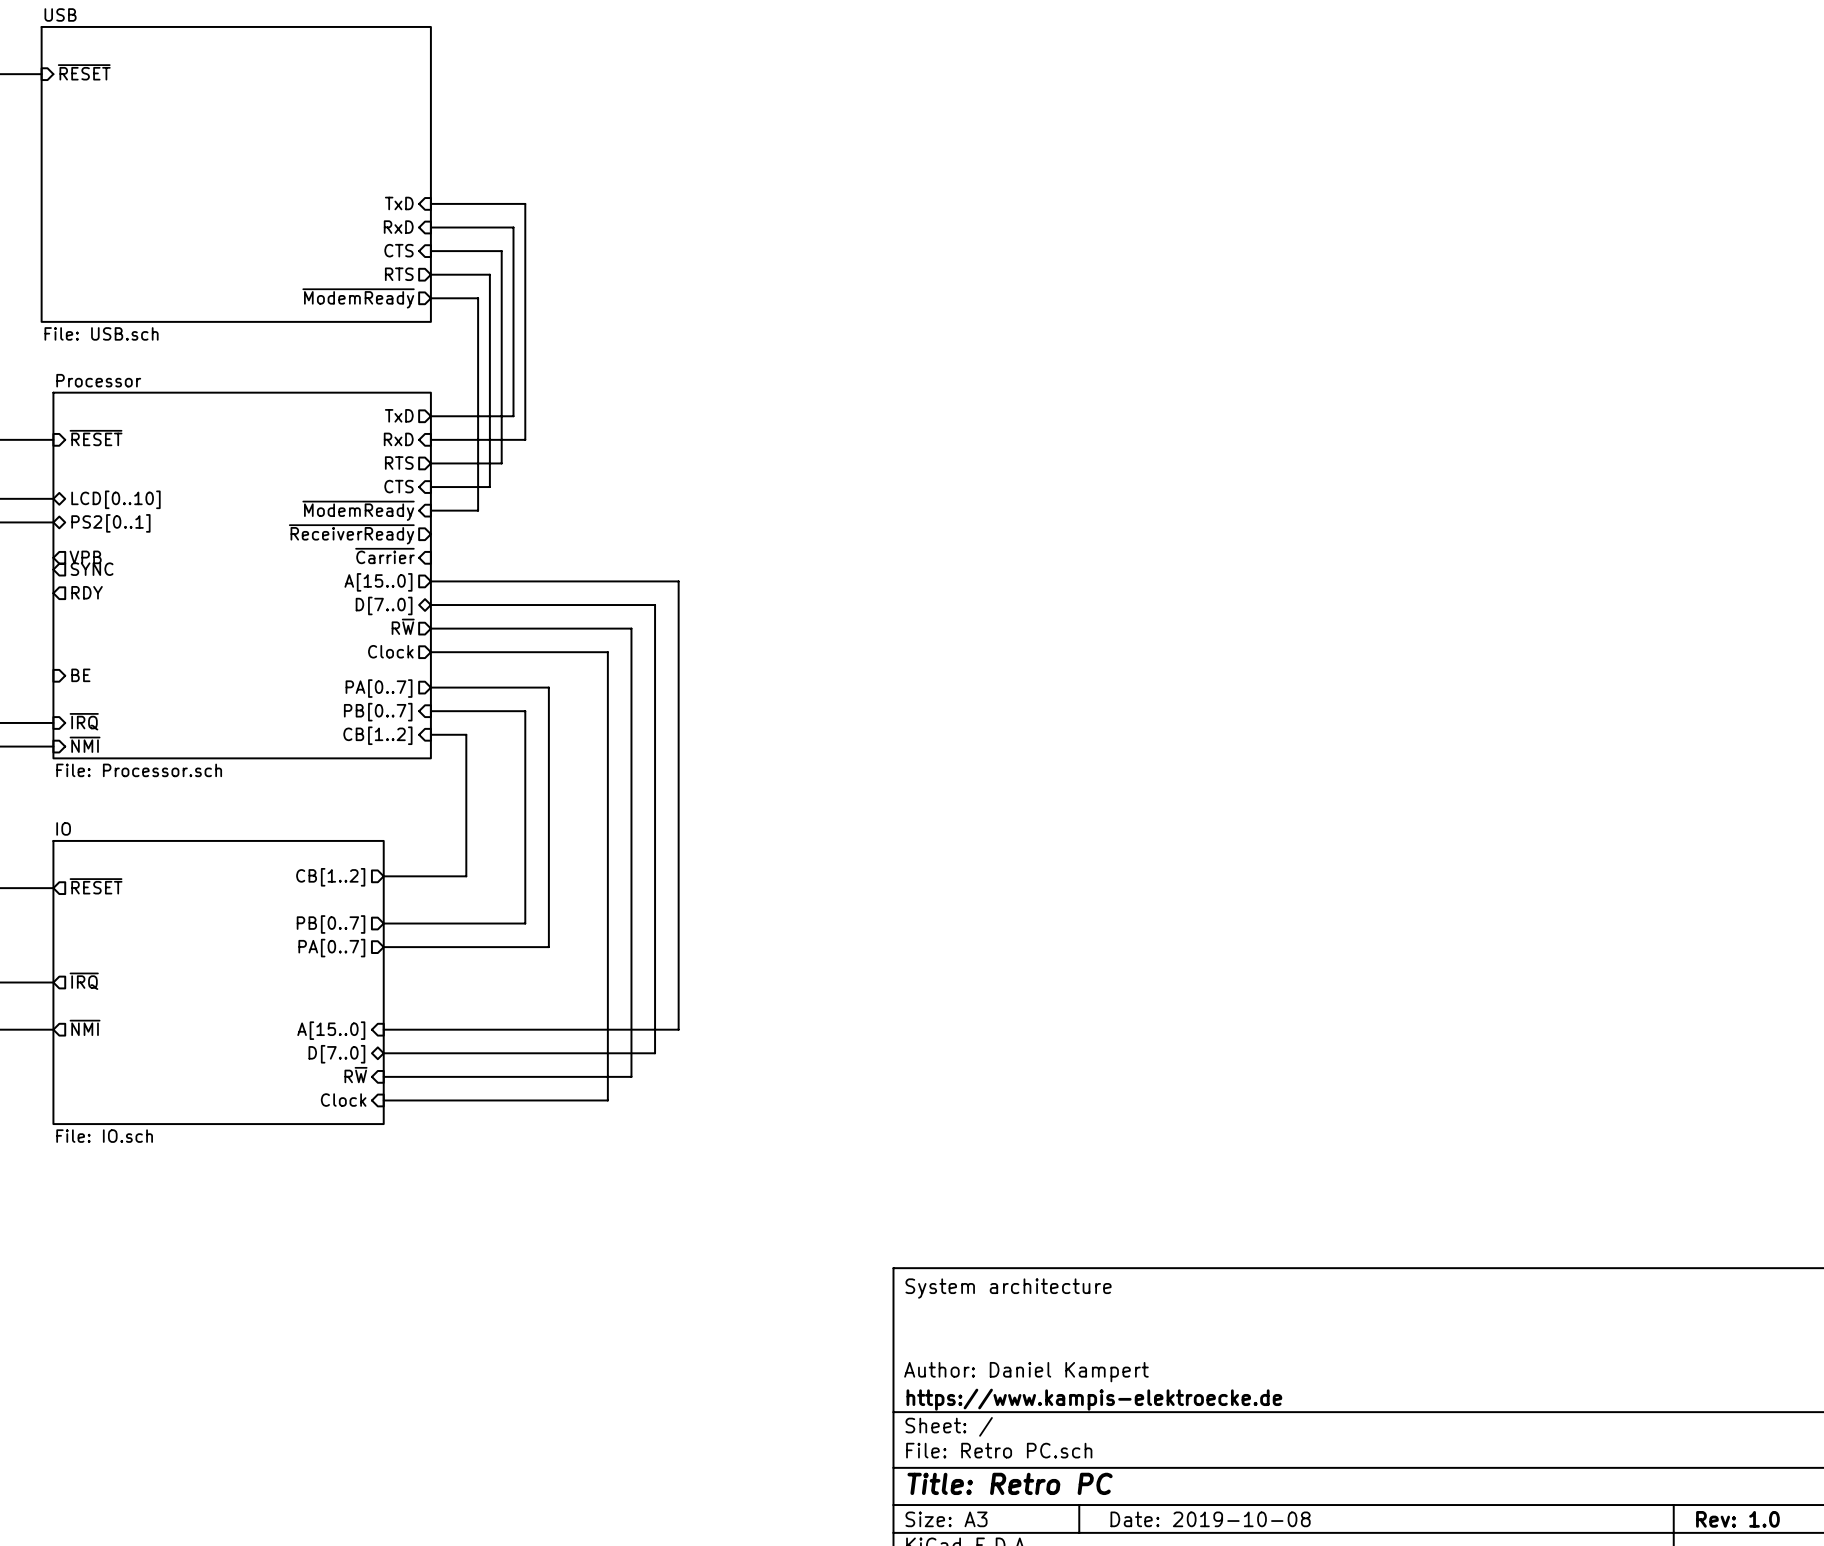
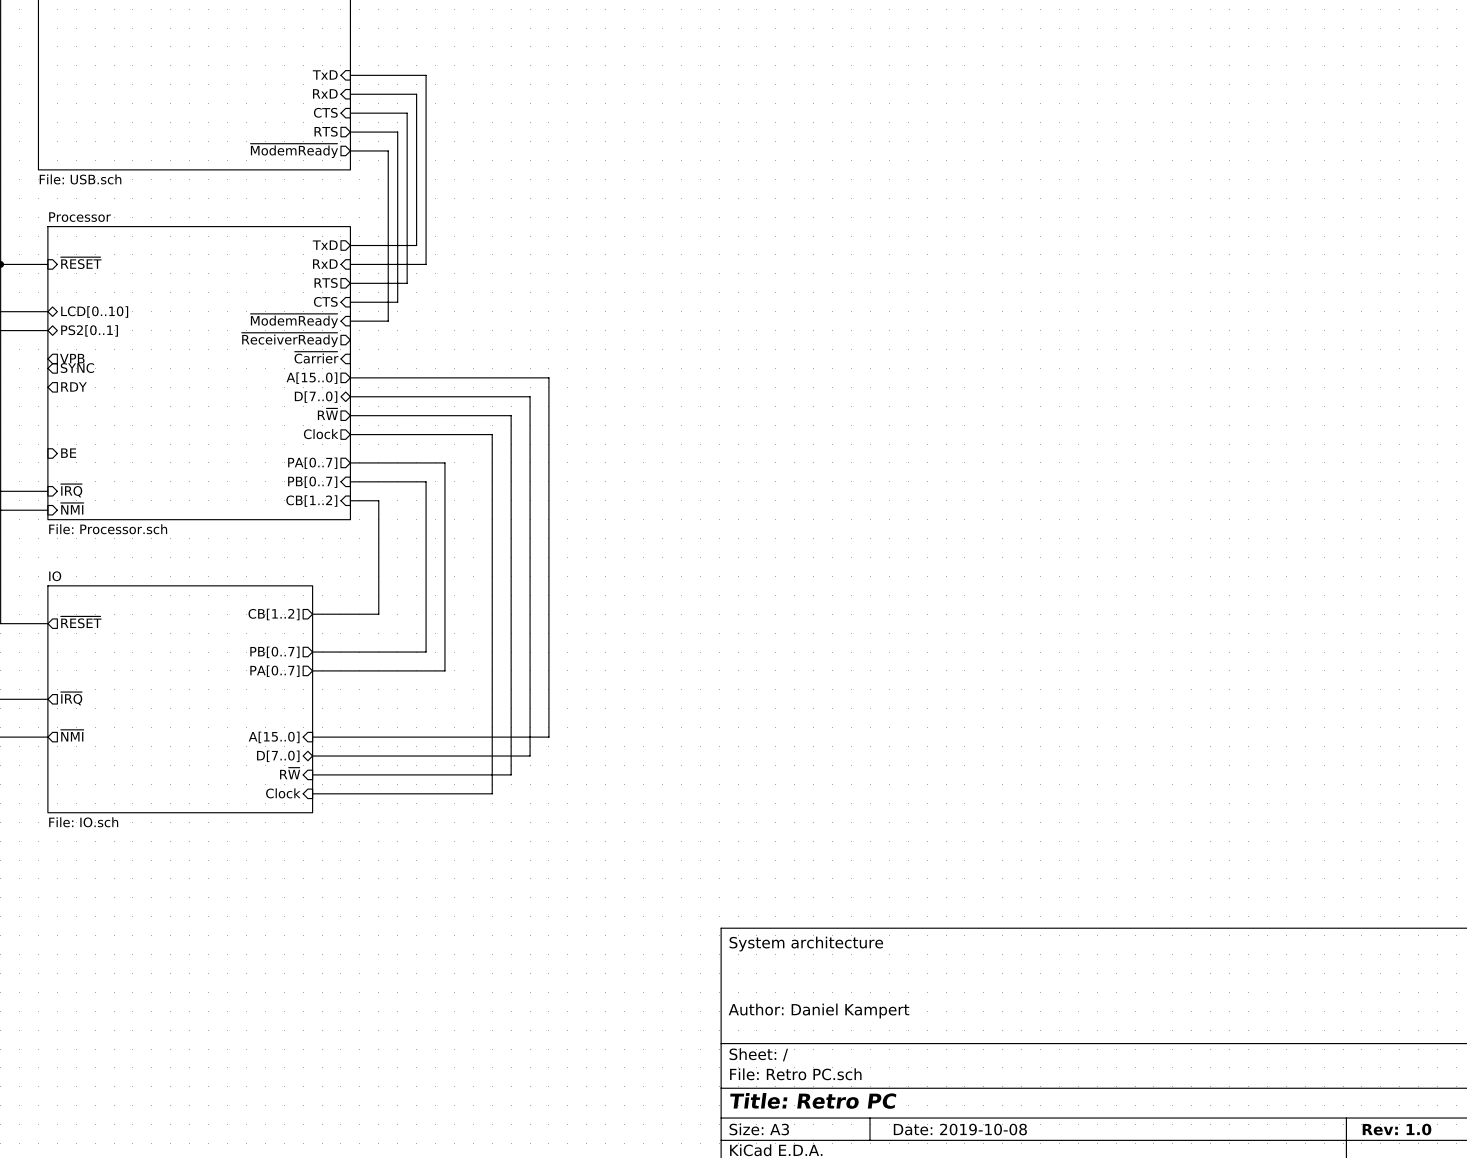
title block: https://www.kampis-elektroecke.de (1094, 1399) -> none

